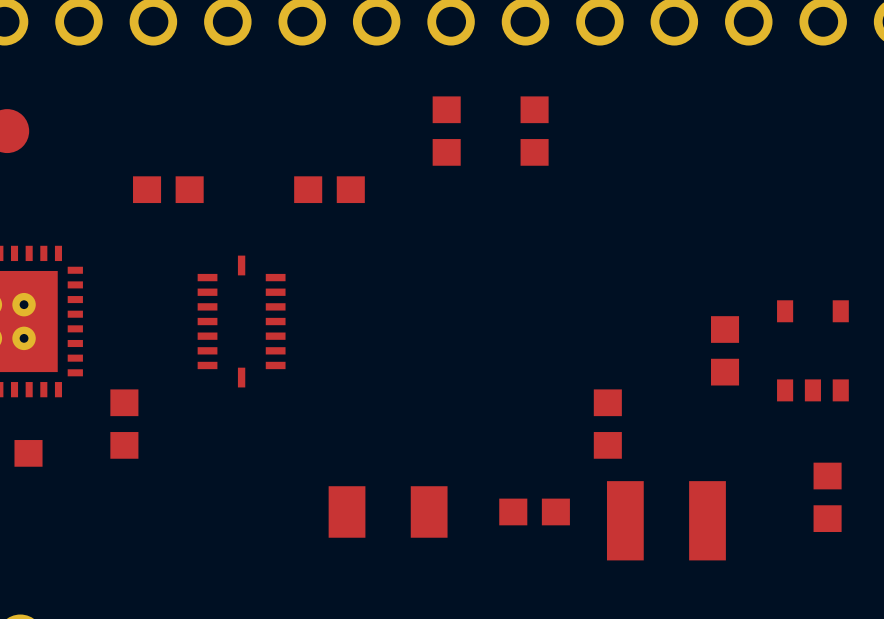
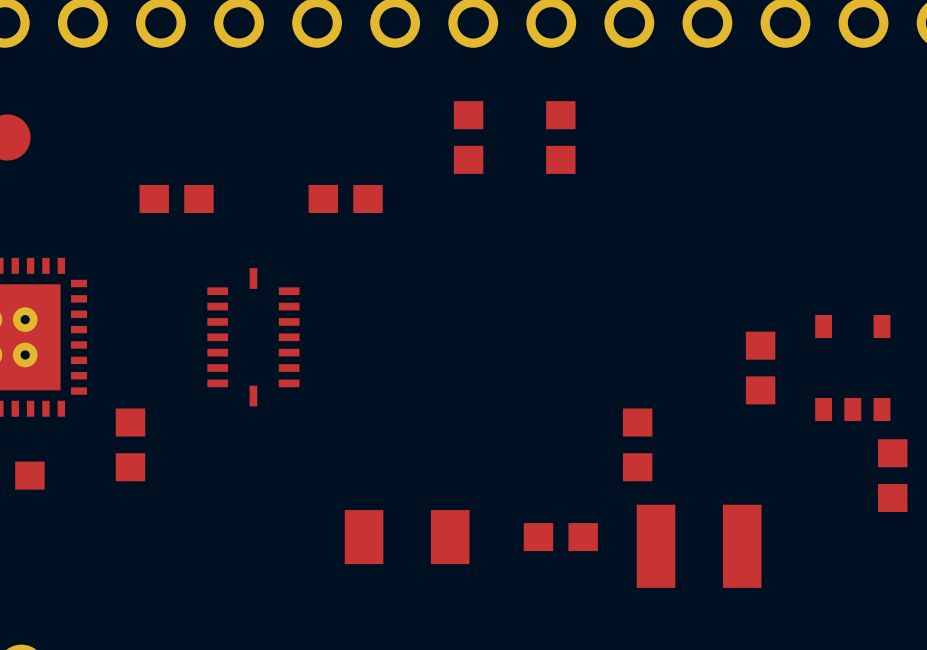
part position: (827, 497) -> (892, 475)

